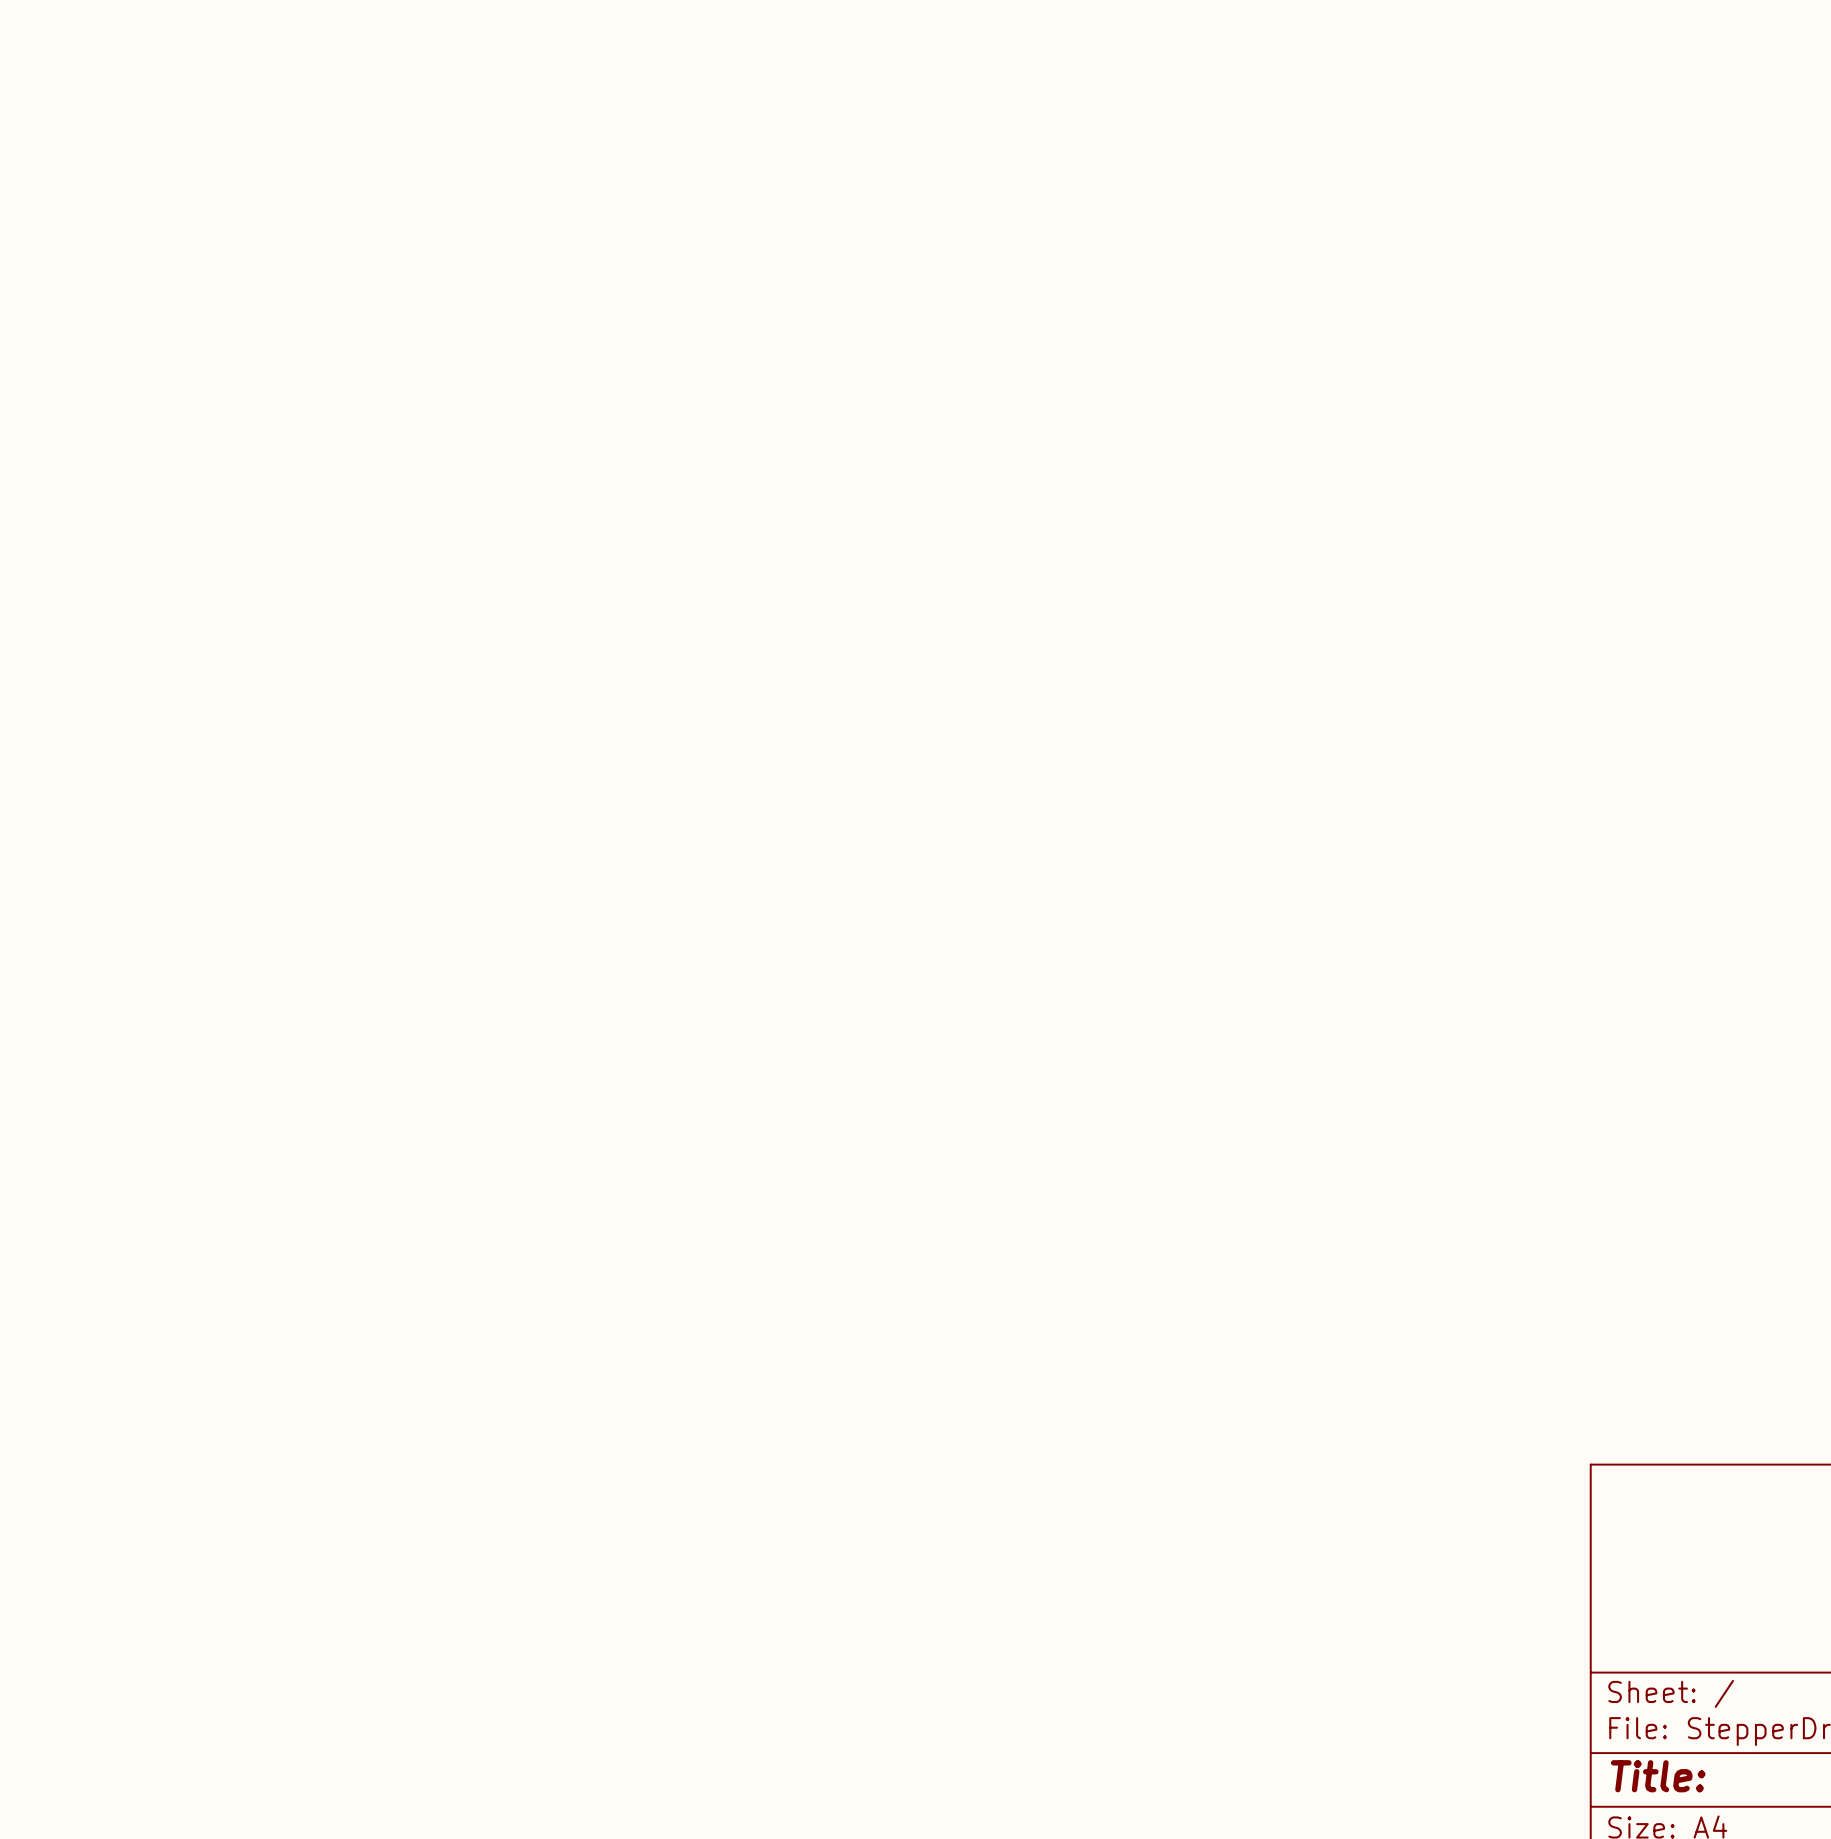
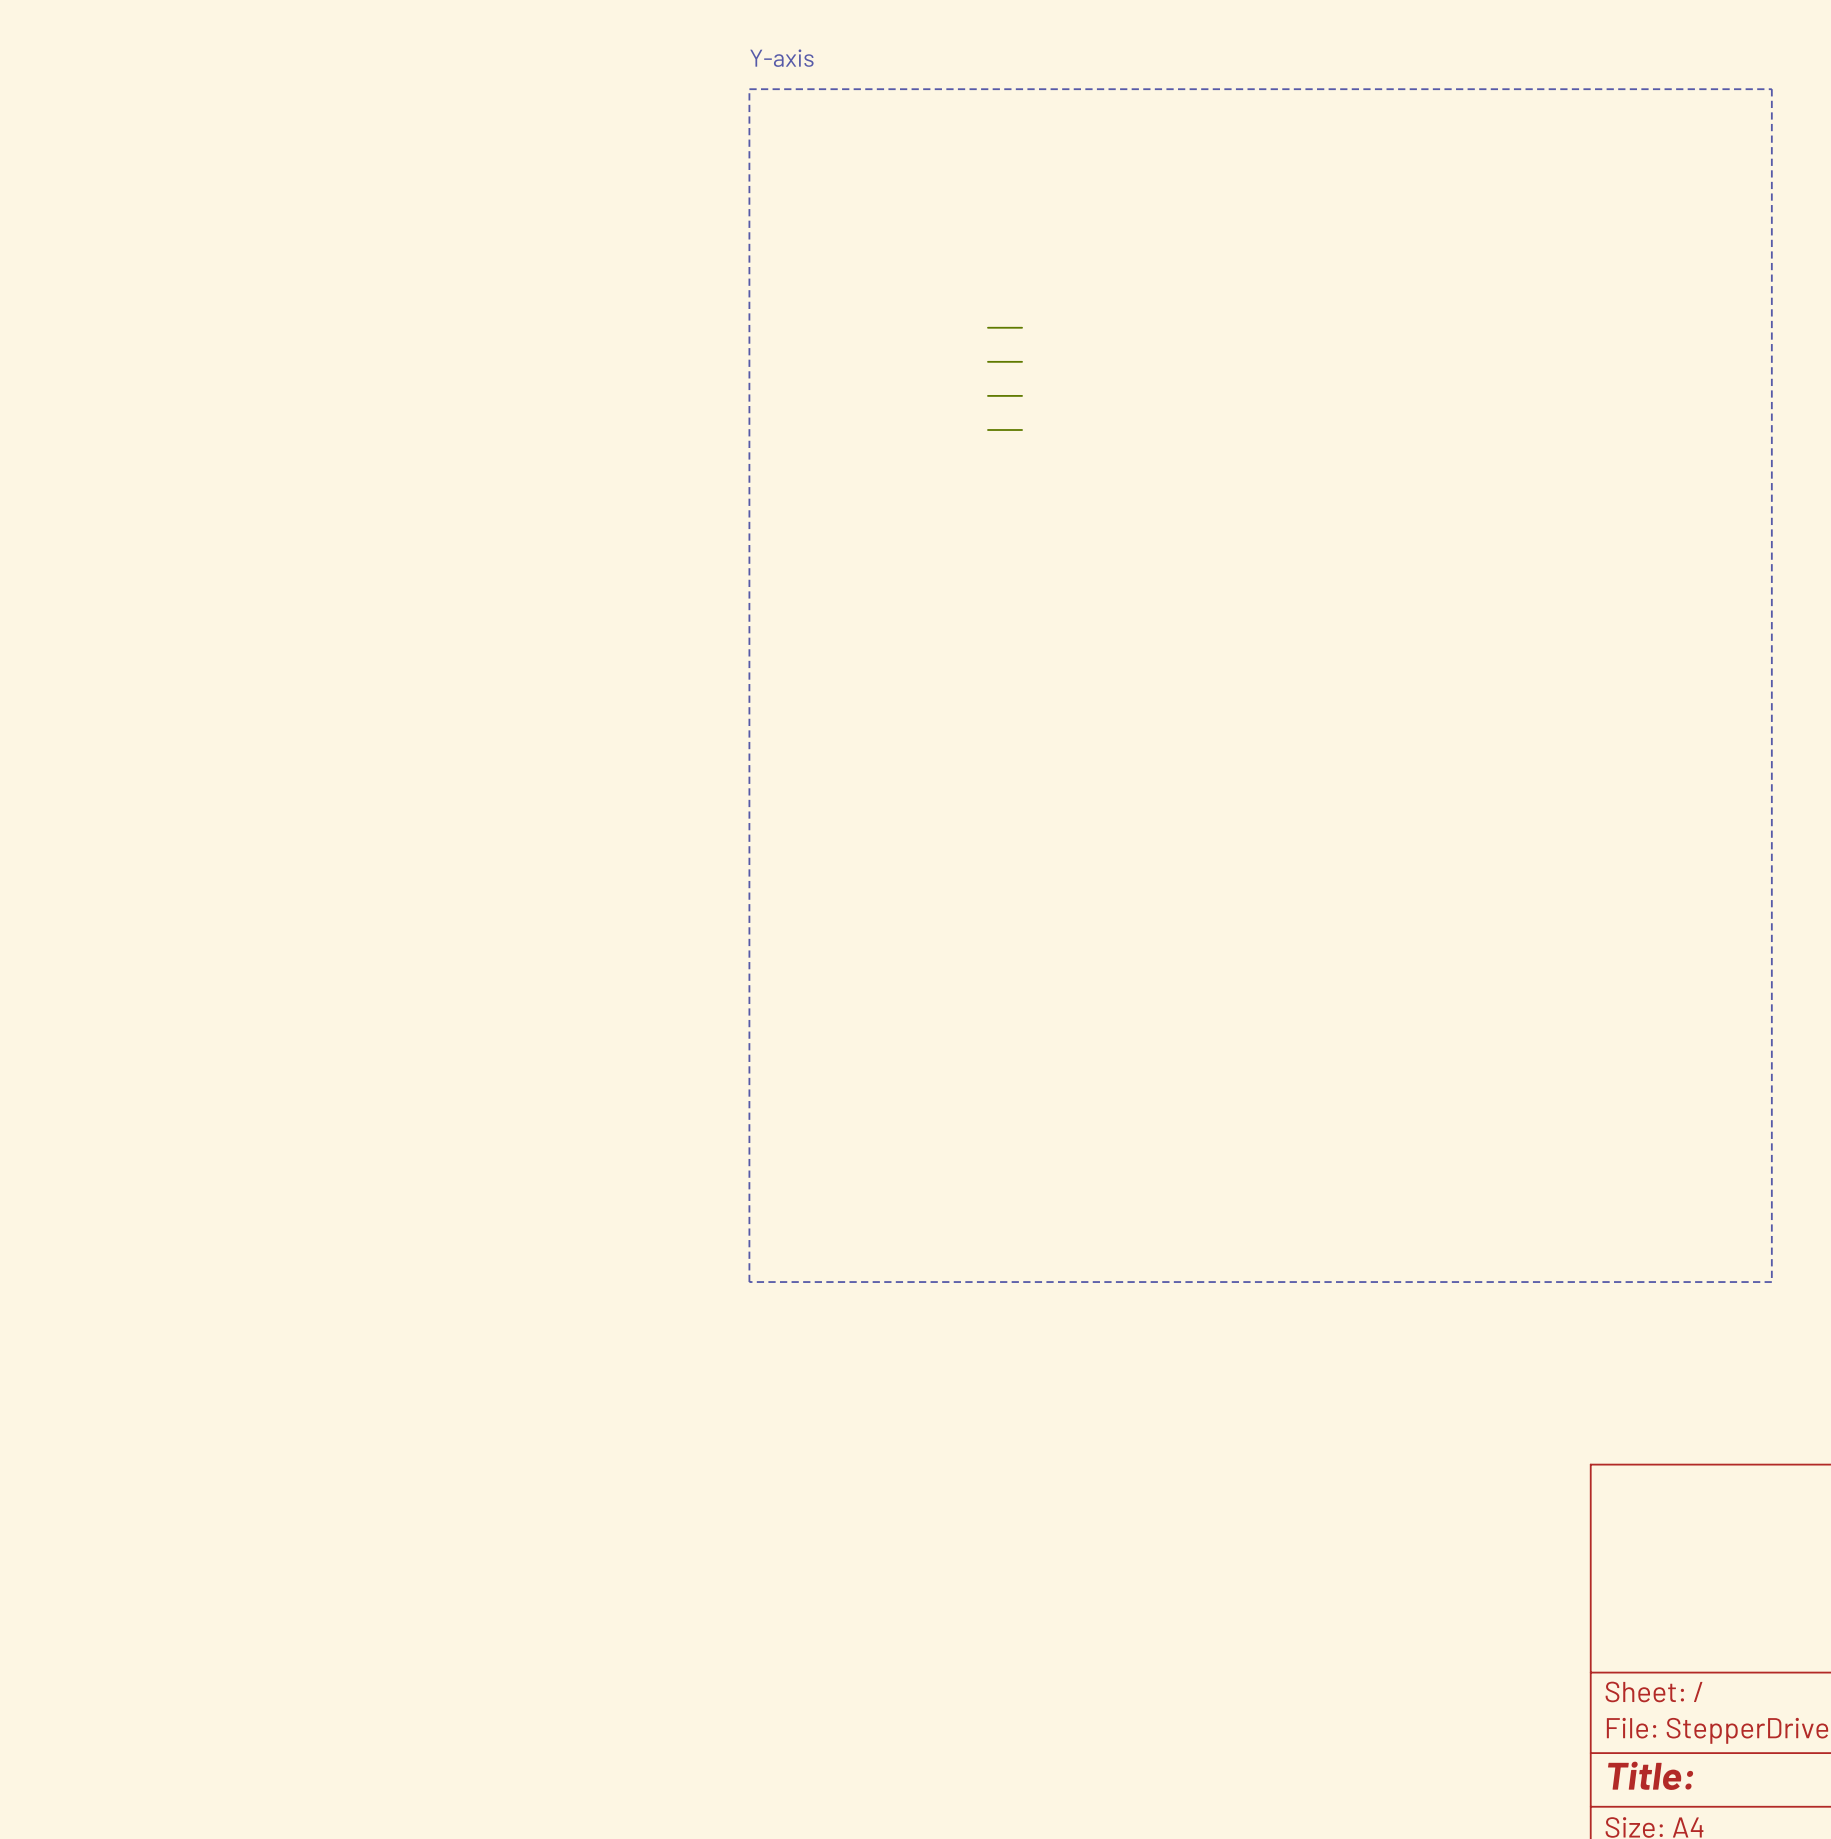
text: none -> Y-axis (781, 58)
line: none -> (749, 89) (1771, 89) (1771, 1282) (749, 1282) (749, 89)
wire: none -> (987, 327) (1022, 327)
wire: none -> (987, 361) (1022, 361)
wire: none -> (987, 395) (1022, 395)
wire: none -> (987, 430) (1022, 430)

